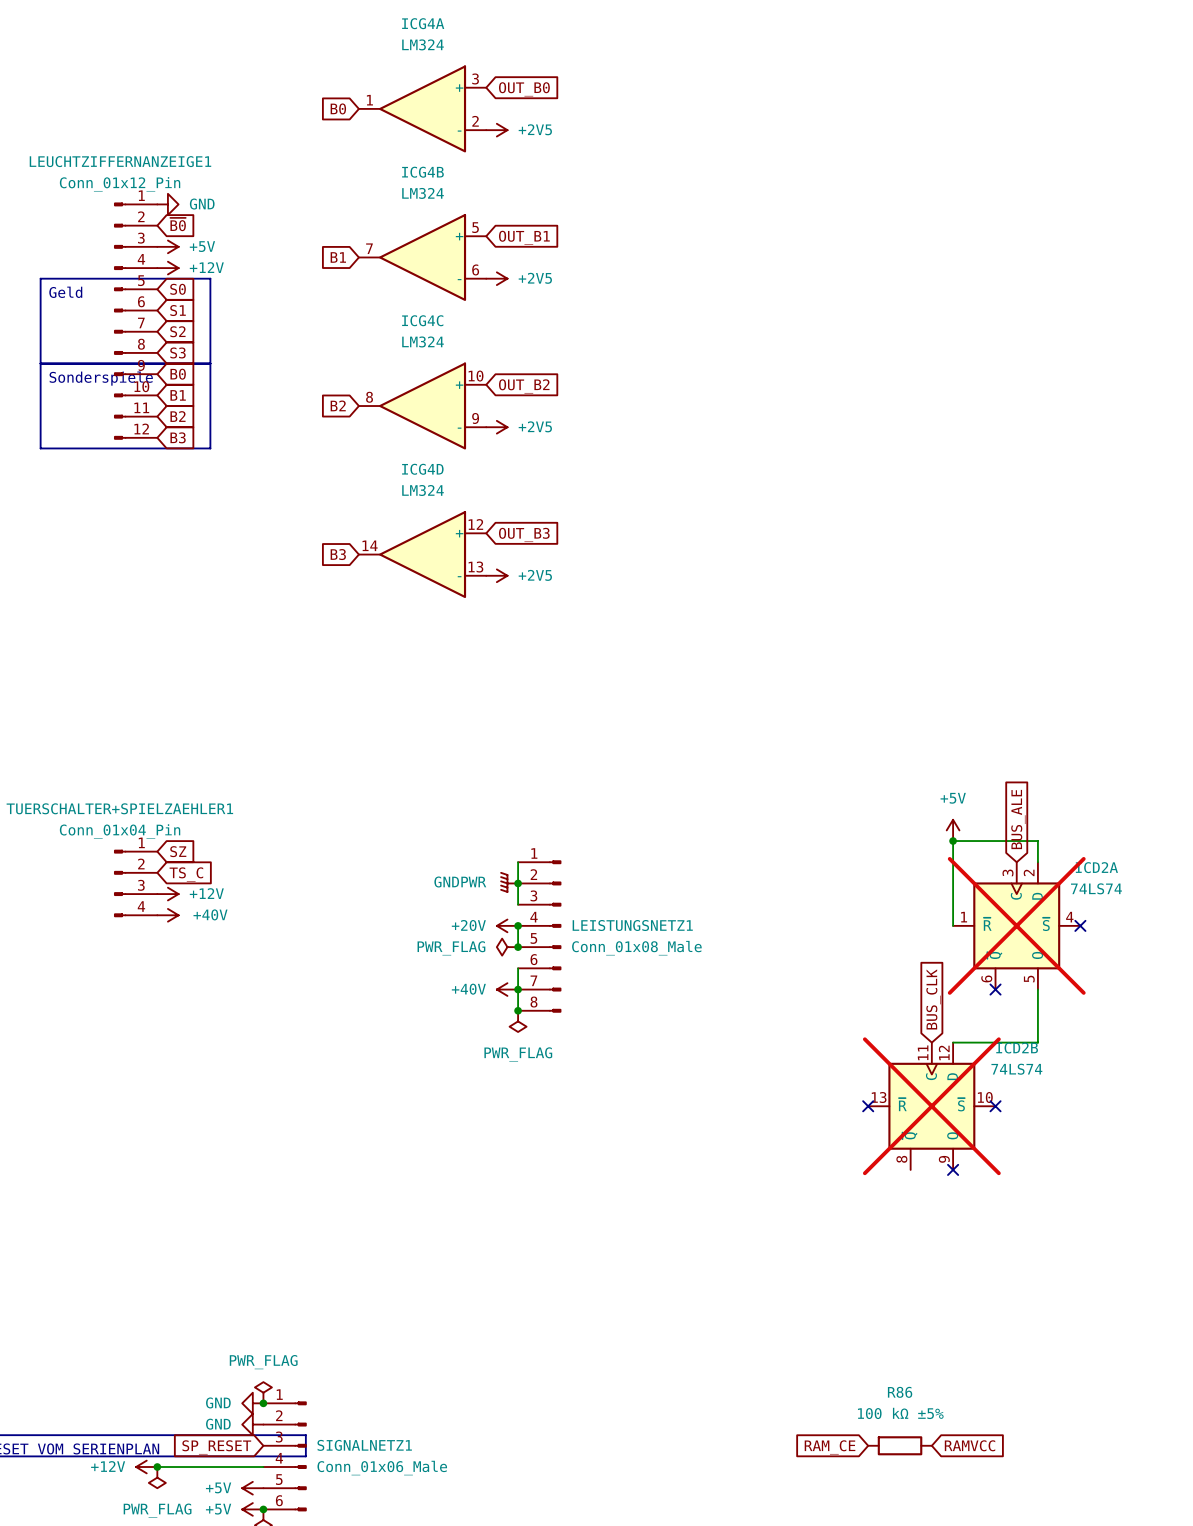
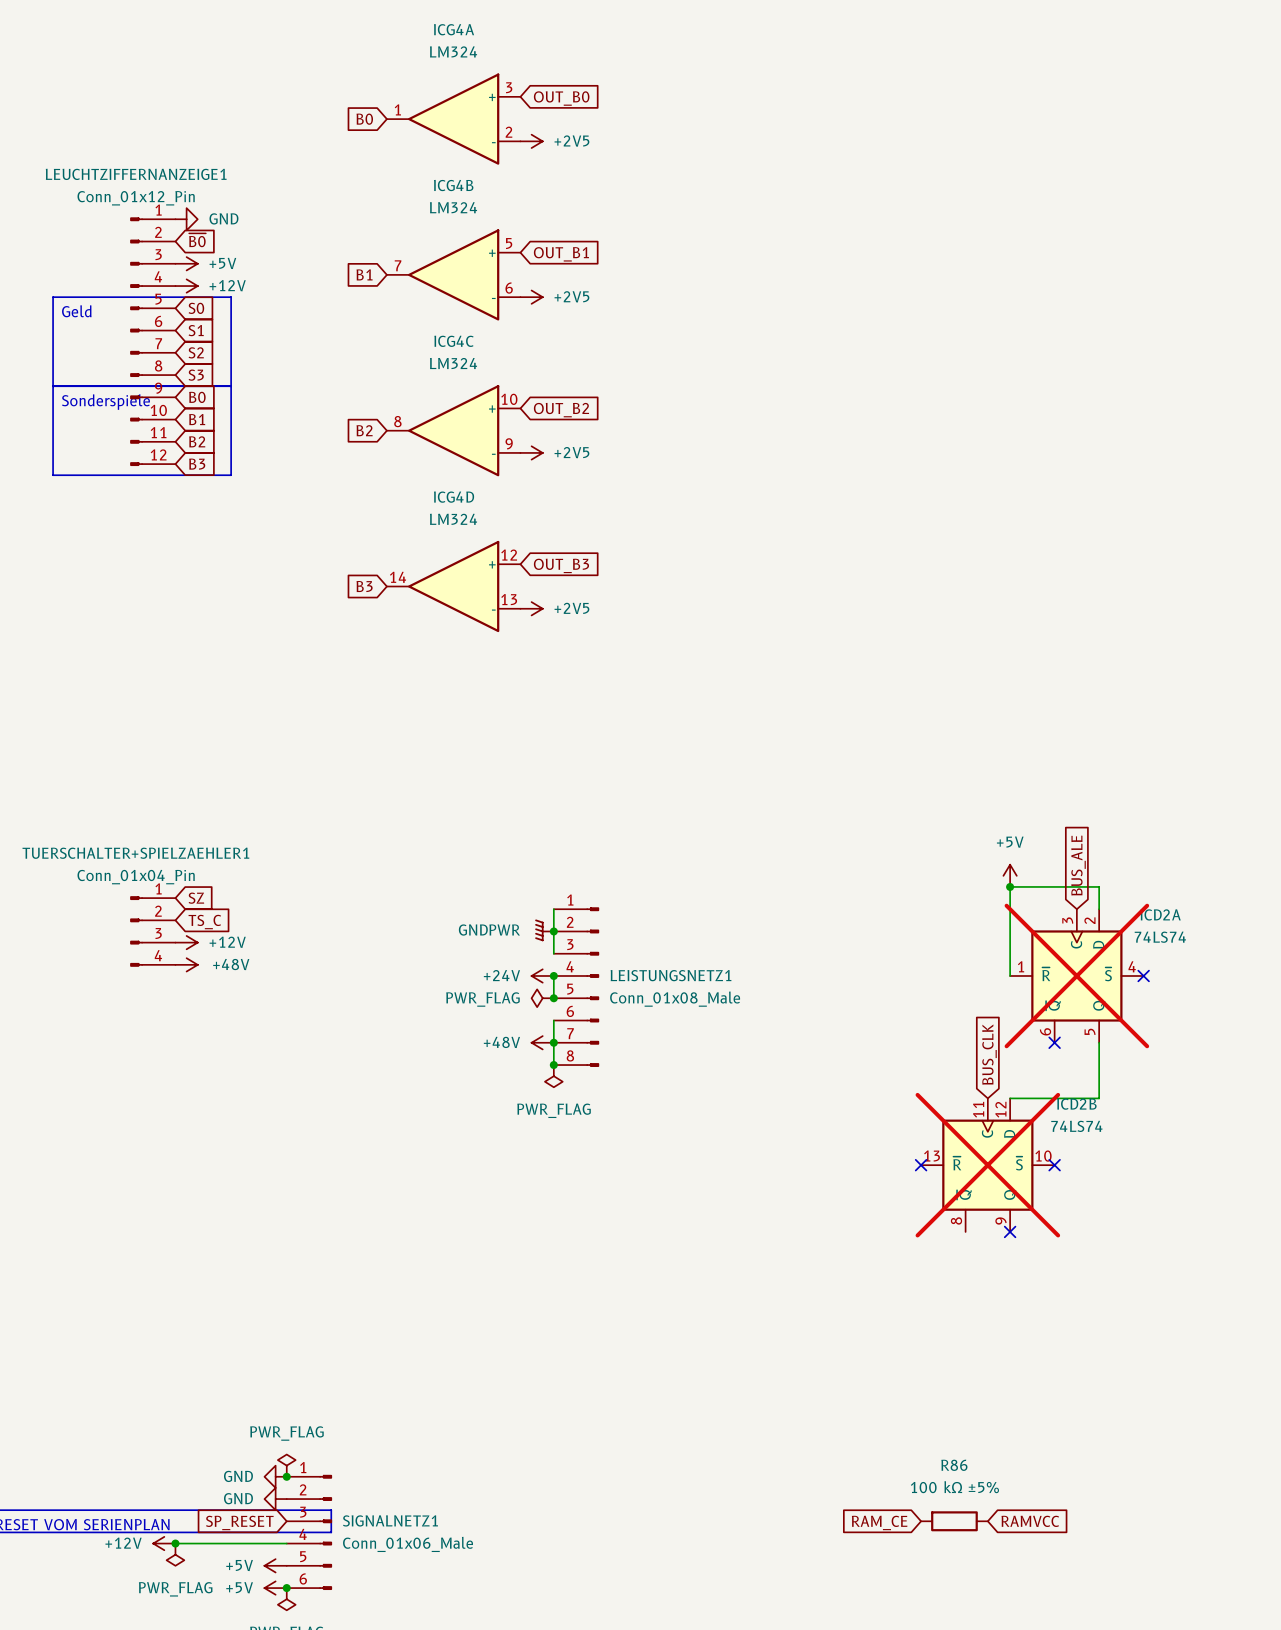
power symbol: +40V (167, 915) -> +48V (186, 964)
power symbol: +20V (507, 925) -> +24V (542, 975)
power symbol: +40V (507, 989) -> +48V (542, 1042)

